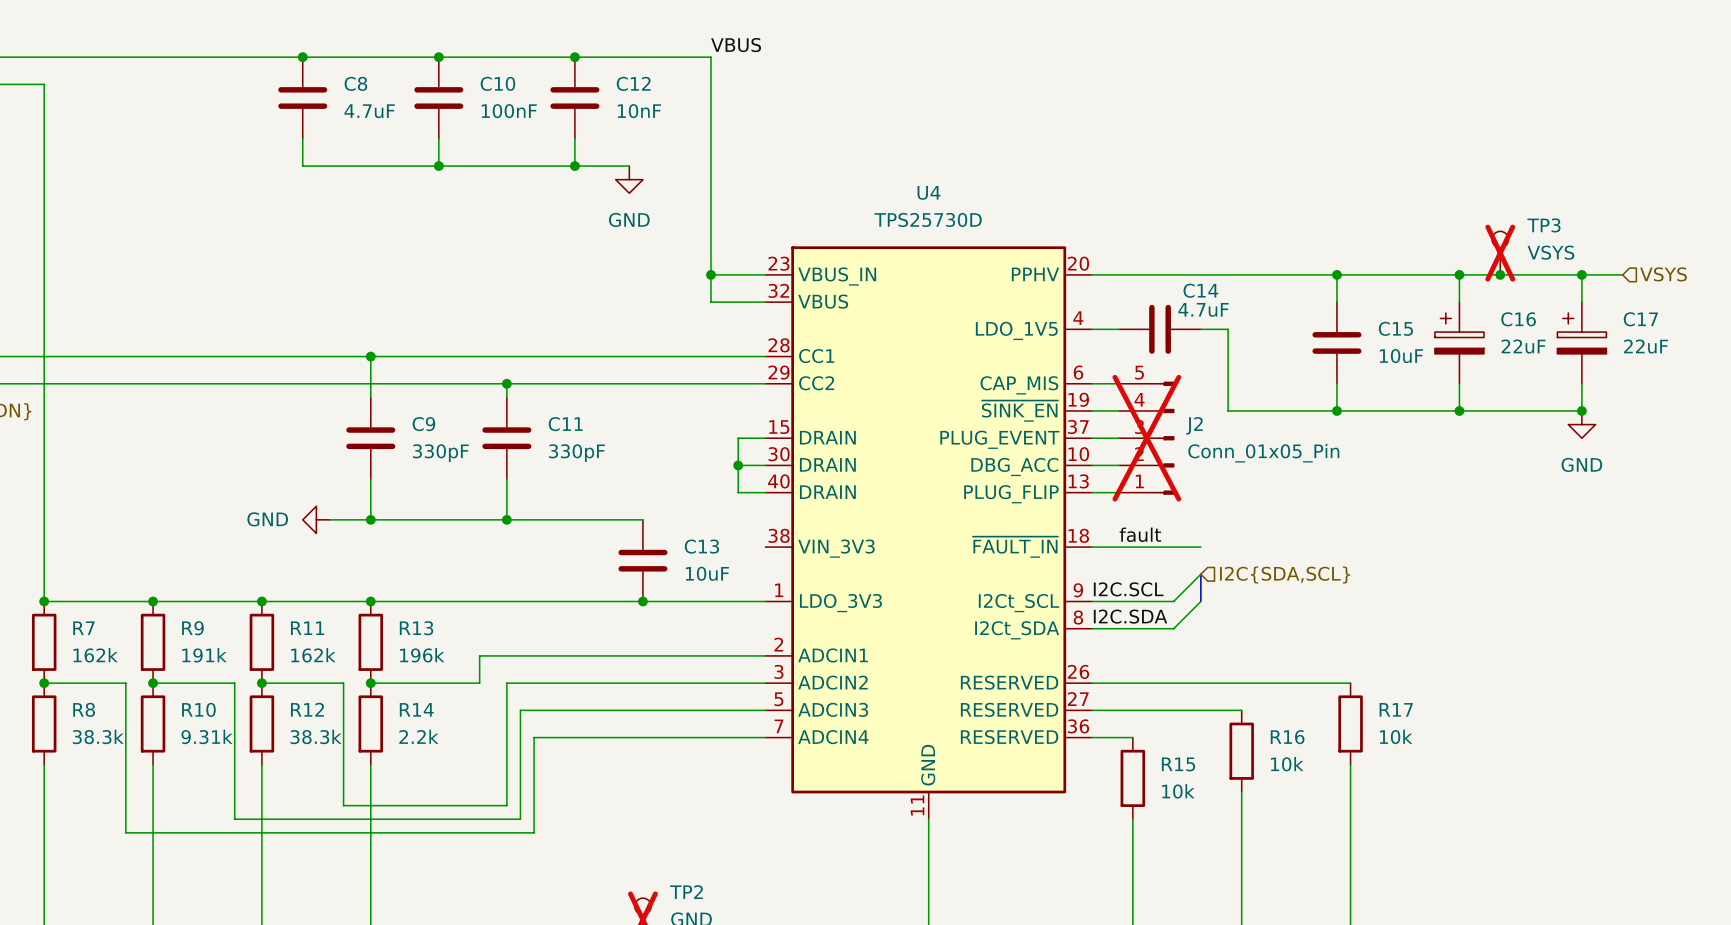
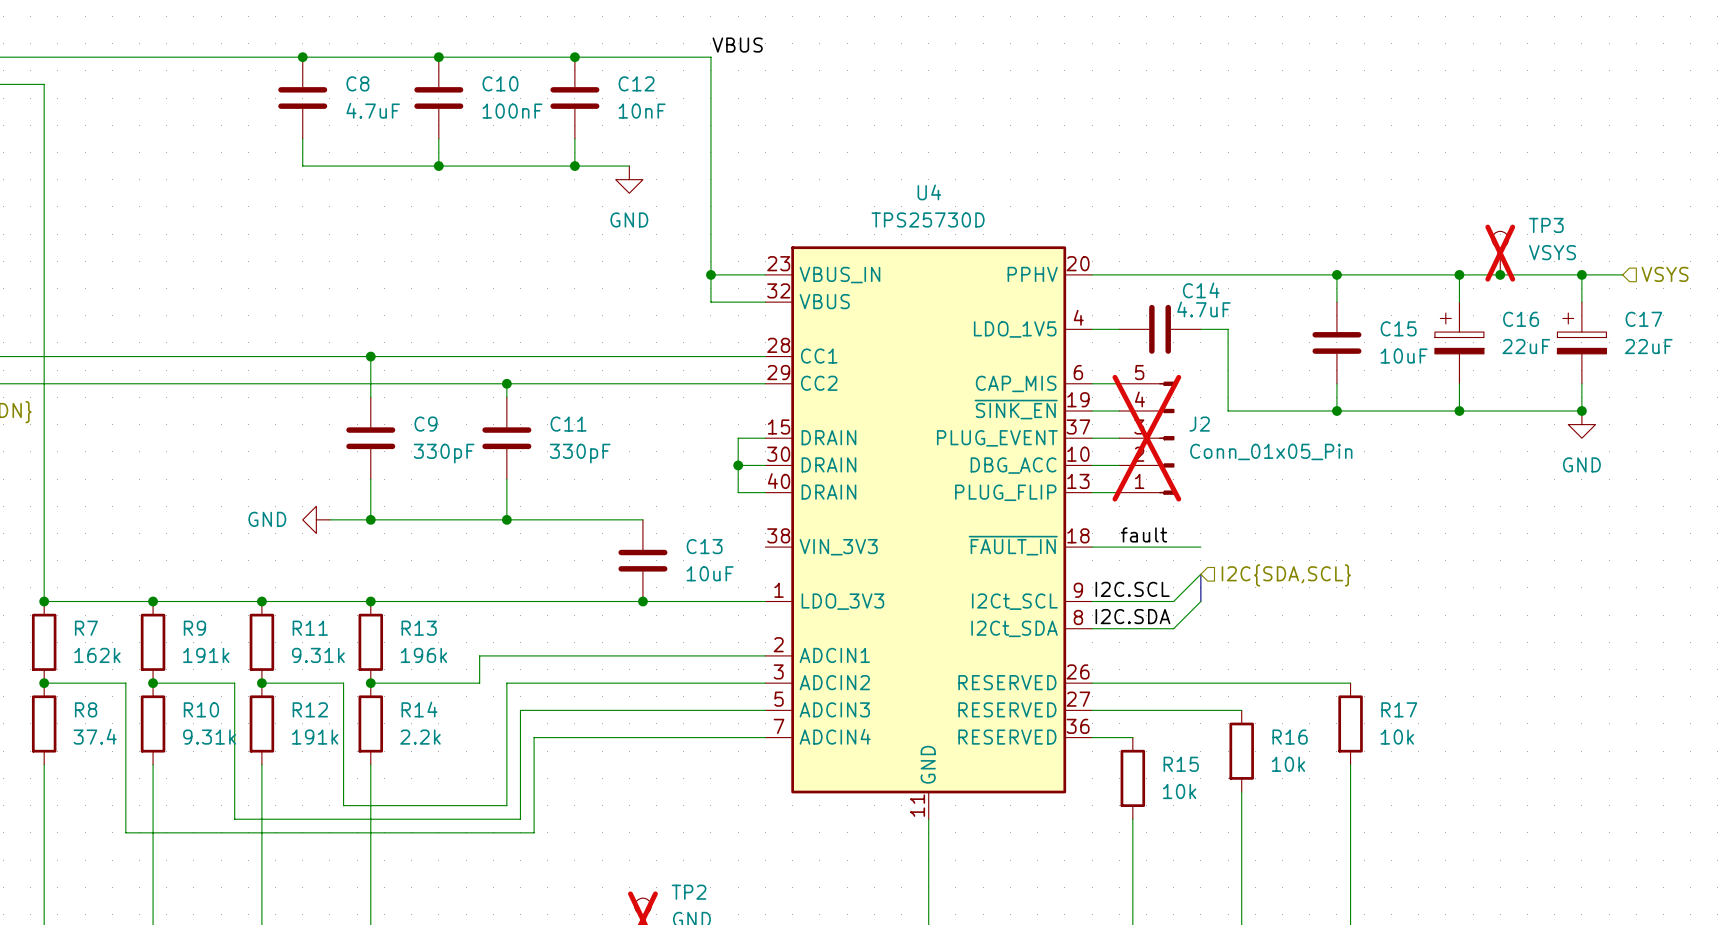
R11 value: 162k (313, 655) -> 9.31k (318, 655)
R8 value: 38.3k (98, 736) -> 37.4 (95, 736)
R12 value: 38.3k (316, 736) -> 191k (315, 737)

